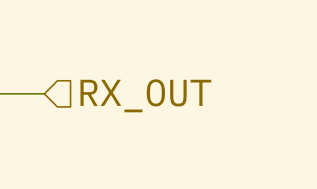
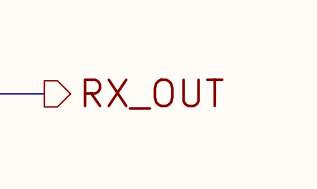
hierarchical label shape: input (145, 95) -> output (153, 94)

